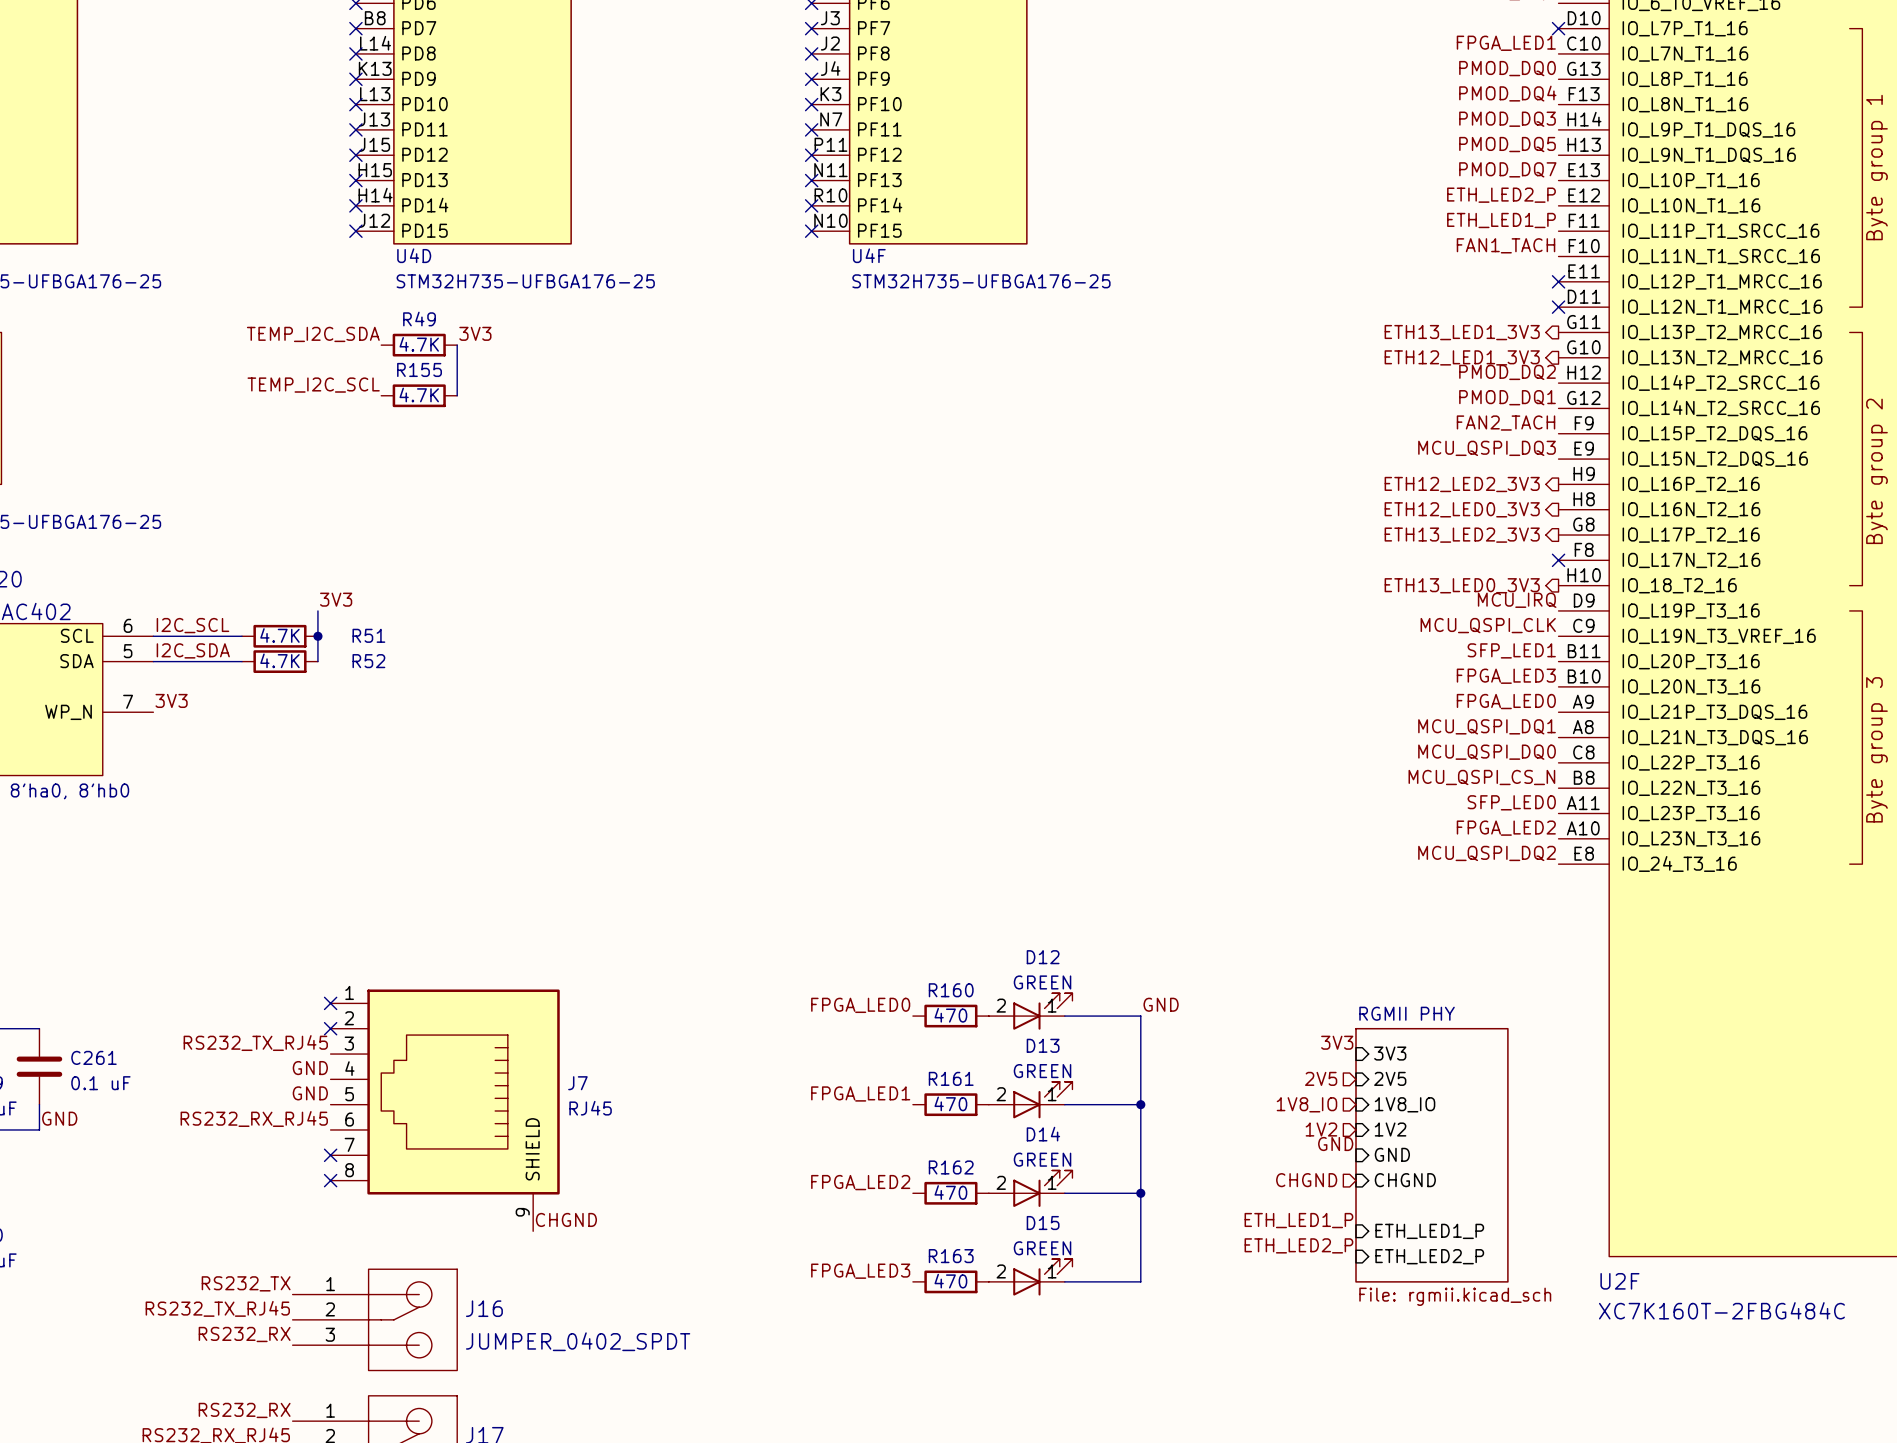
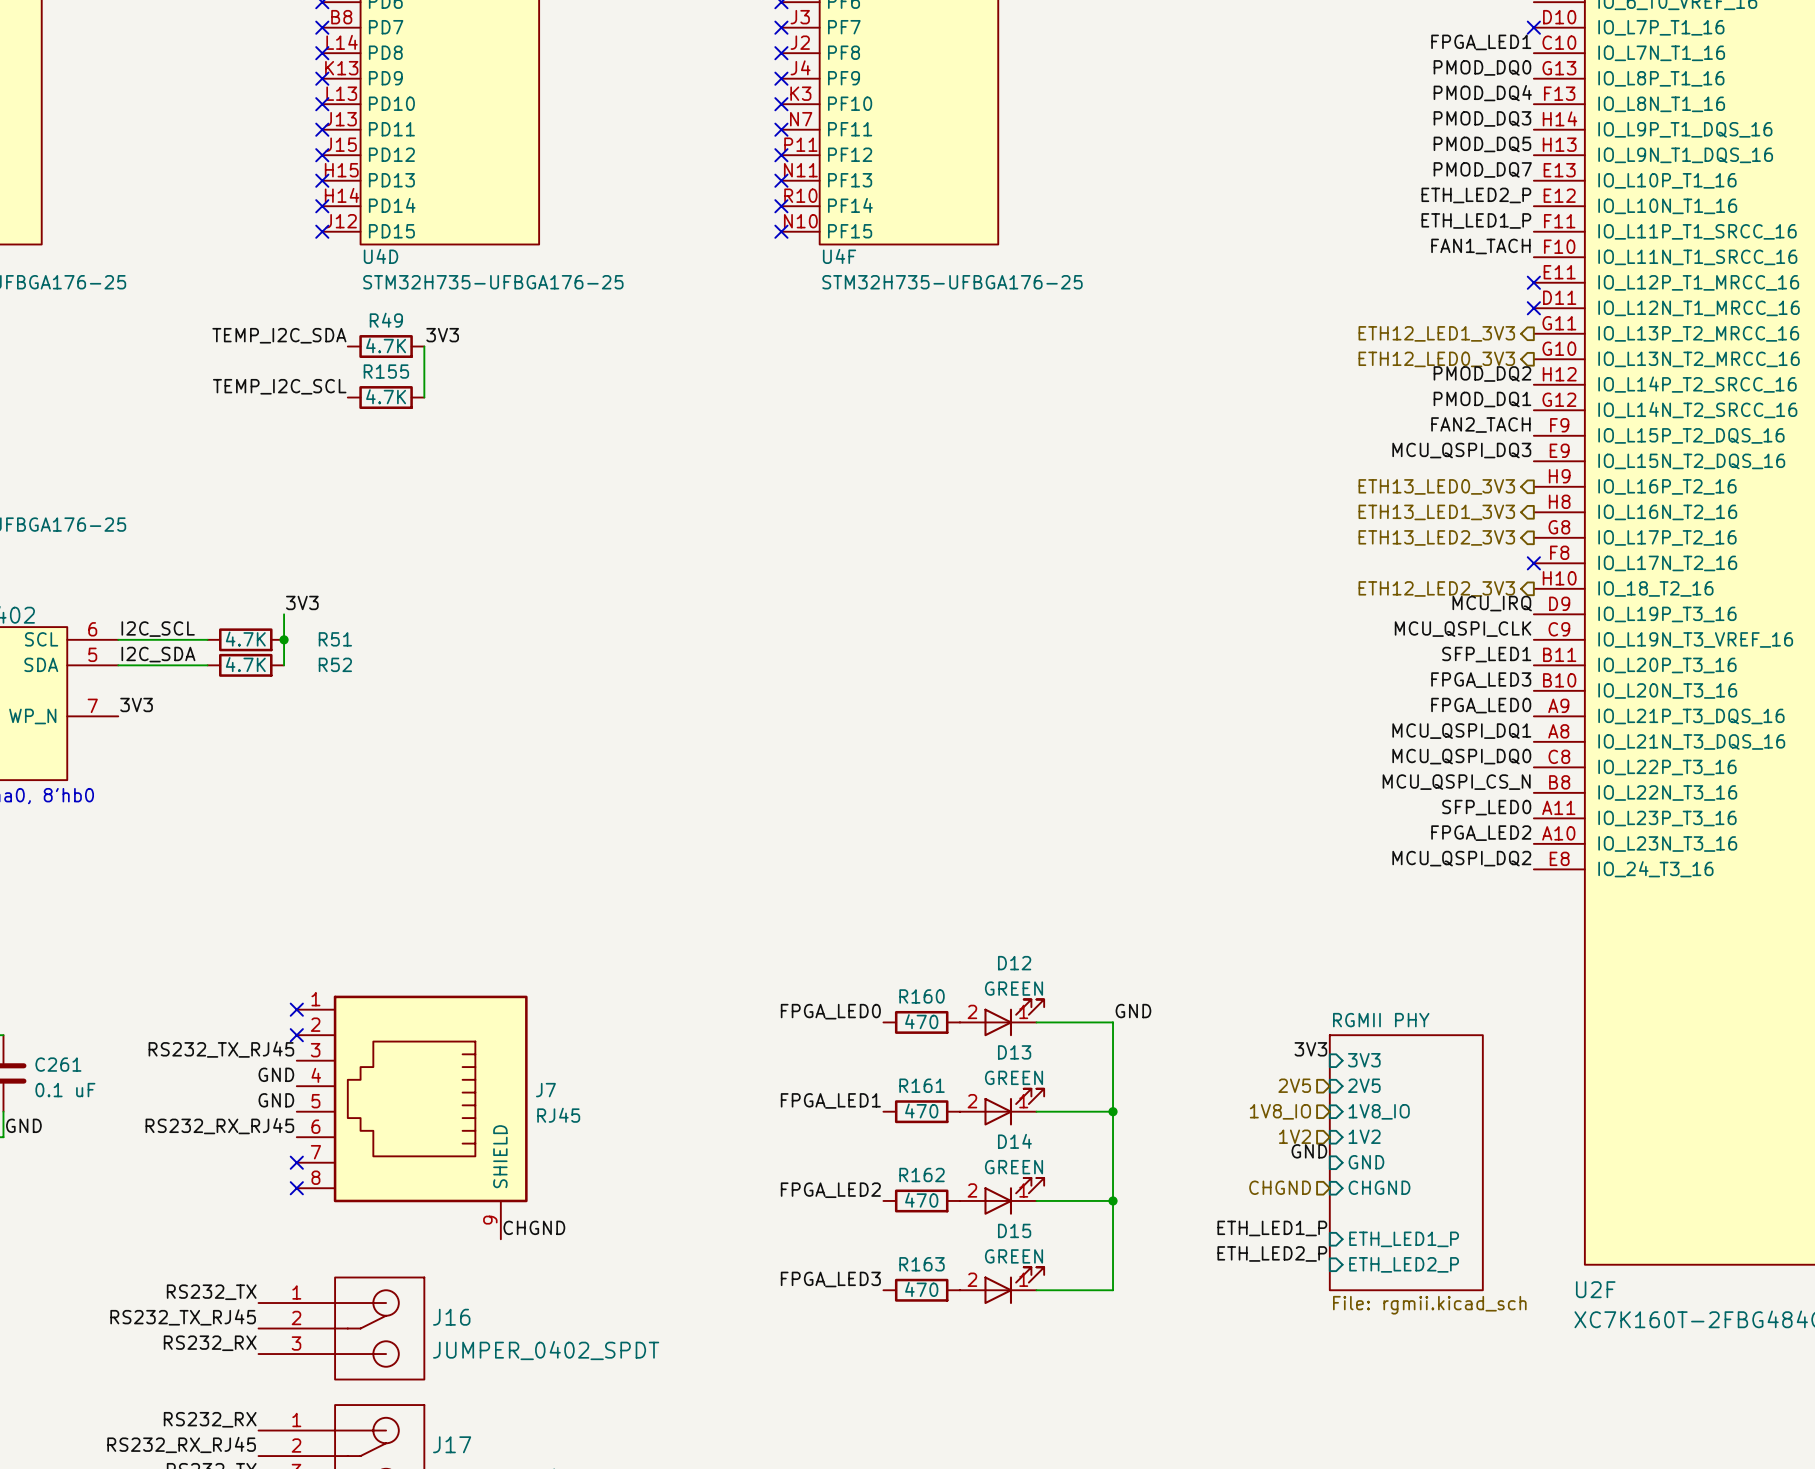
hierarchical label: ETH13_LED1_3V3 (1462, 332) -> ETH12_LED1_3V3 (1436, 333)
hierarchical label: ETH12_LED1_3V3 (1462, 357) -> ETH12_LED0_3V3 (1436, 359)
hierarchical label: ETH12_LED2_3V3 (1462, 484) -> ETH13_LED0_3V3 (1436, 486)
hierarchical label: ETH12_LED0_3V3 (1462, 509) -> ETH13_LED1_3V3 (1436, 512)
hierarchical label: ETH13_LED0_3V3 (1462, 585) -> ETH12_LED2_3V3 (1436, 588)

